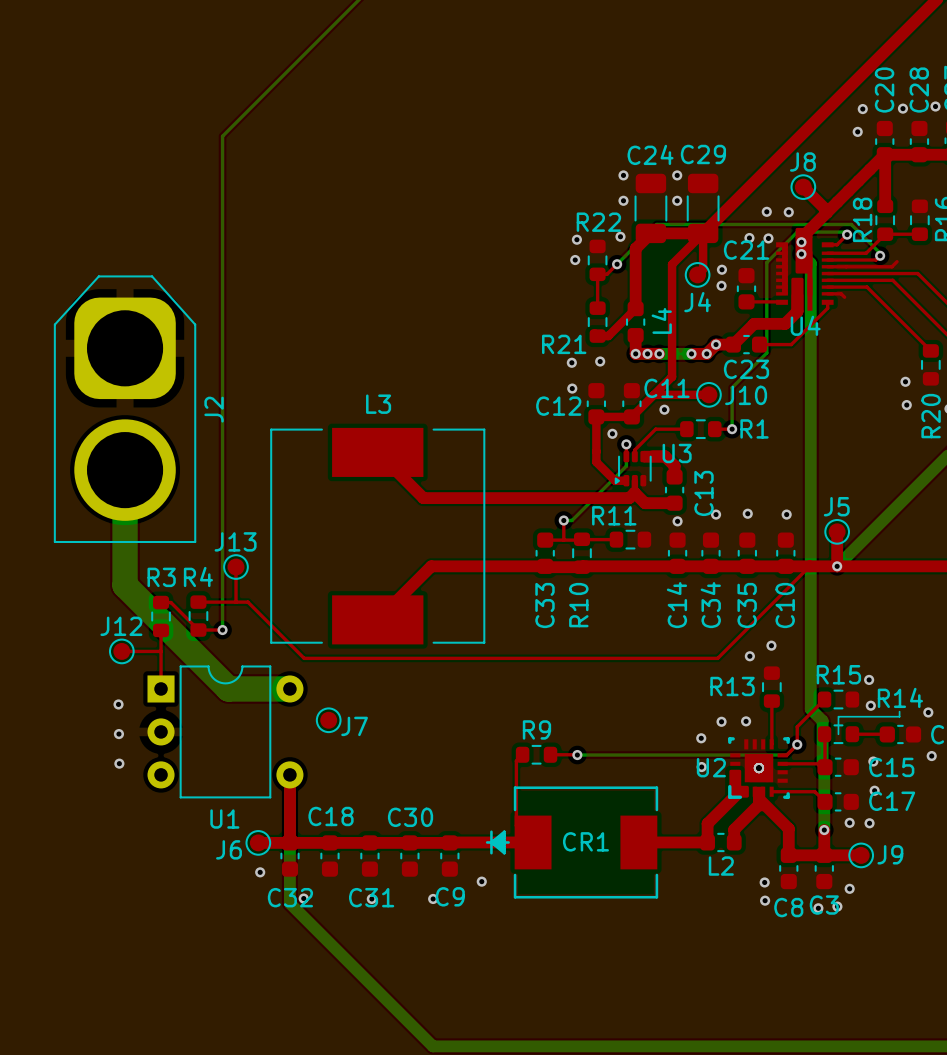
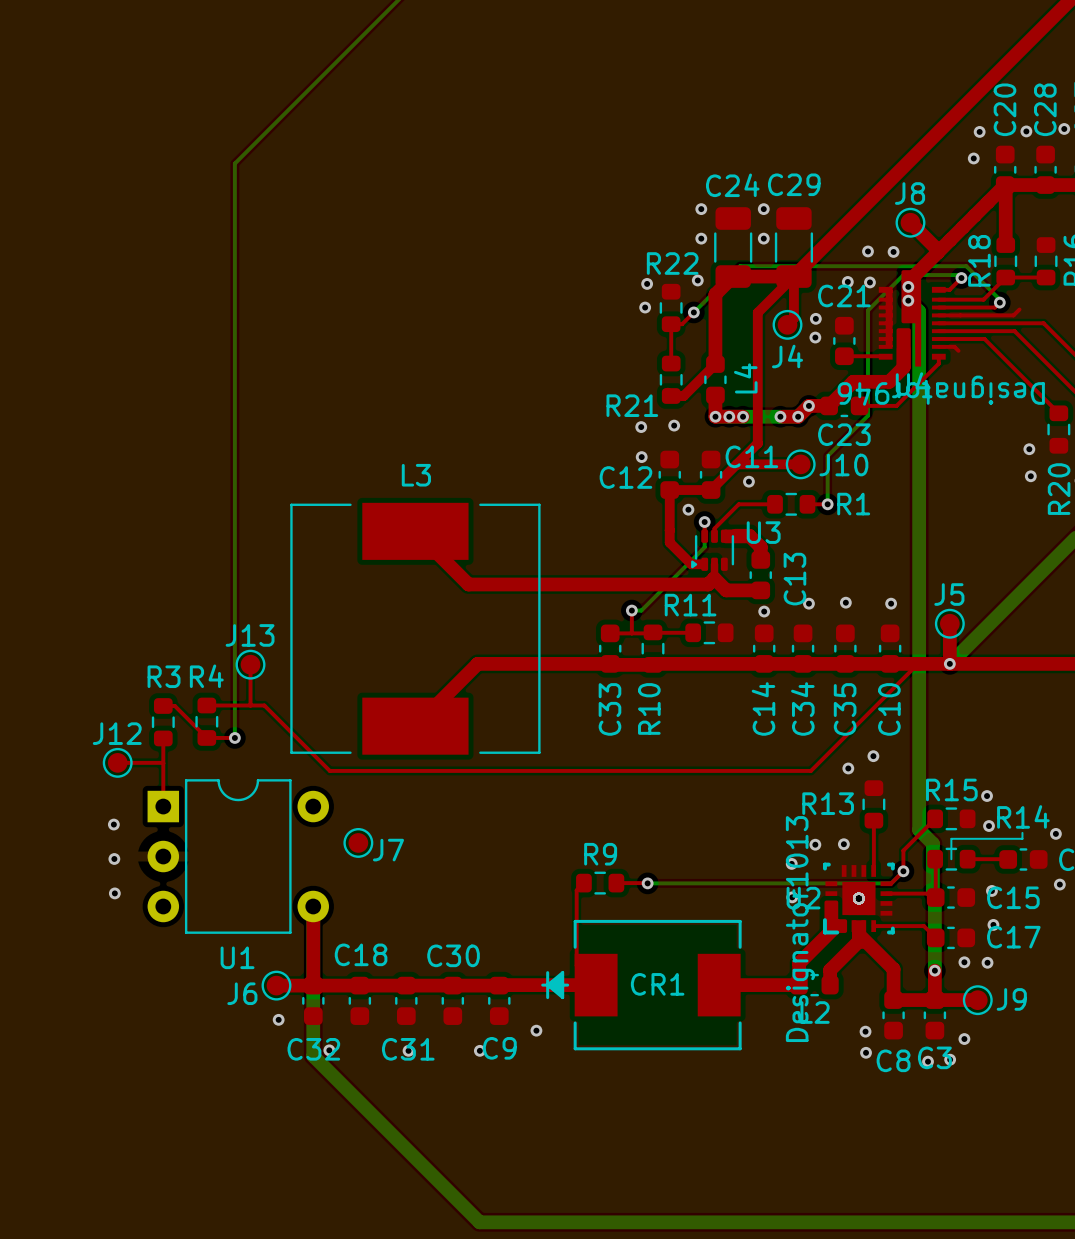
U4 text: none -> Designator946 (941, 390)
J2: (125, 409) -> none
bottom track: (125, 470) (125, 585) (228, 688) (289, 688) -> none
U2 text: none -> Designator1013 (800, 929)

